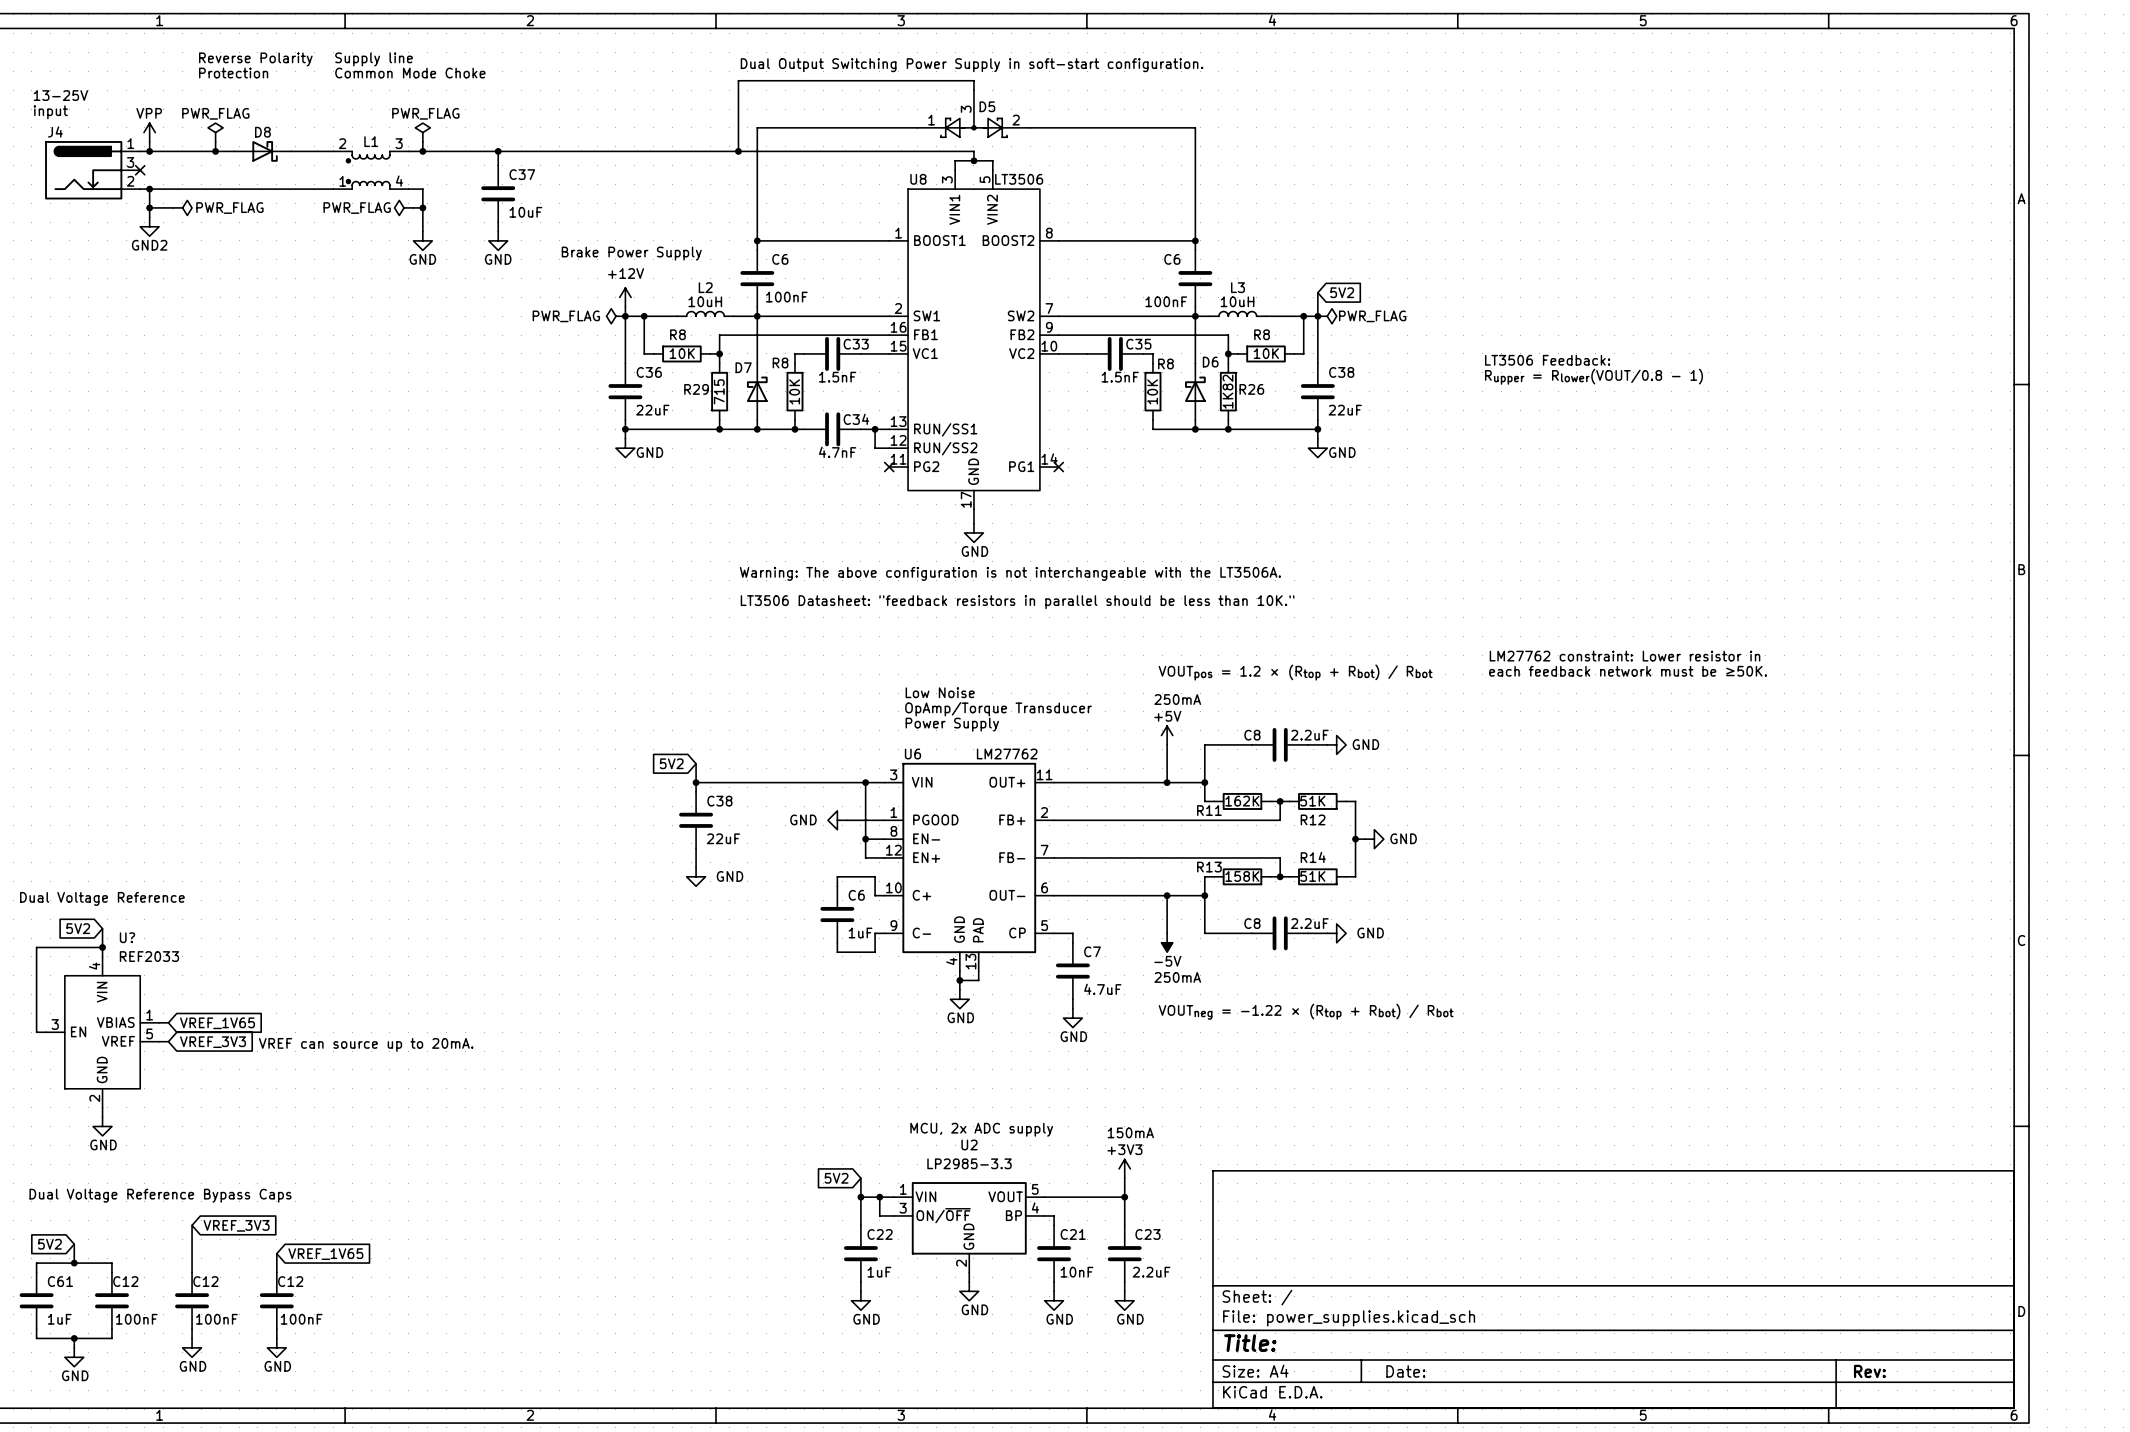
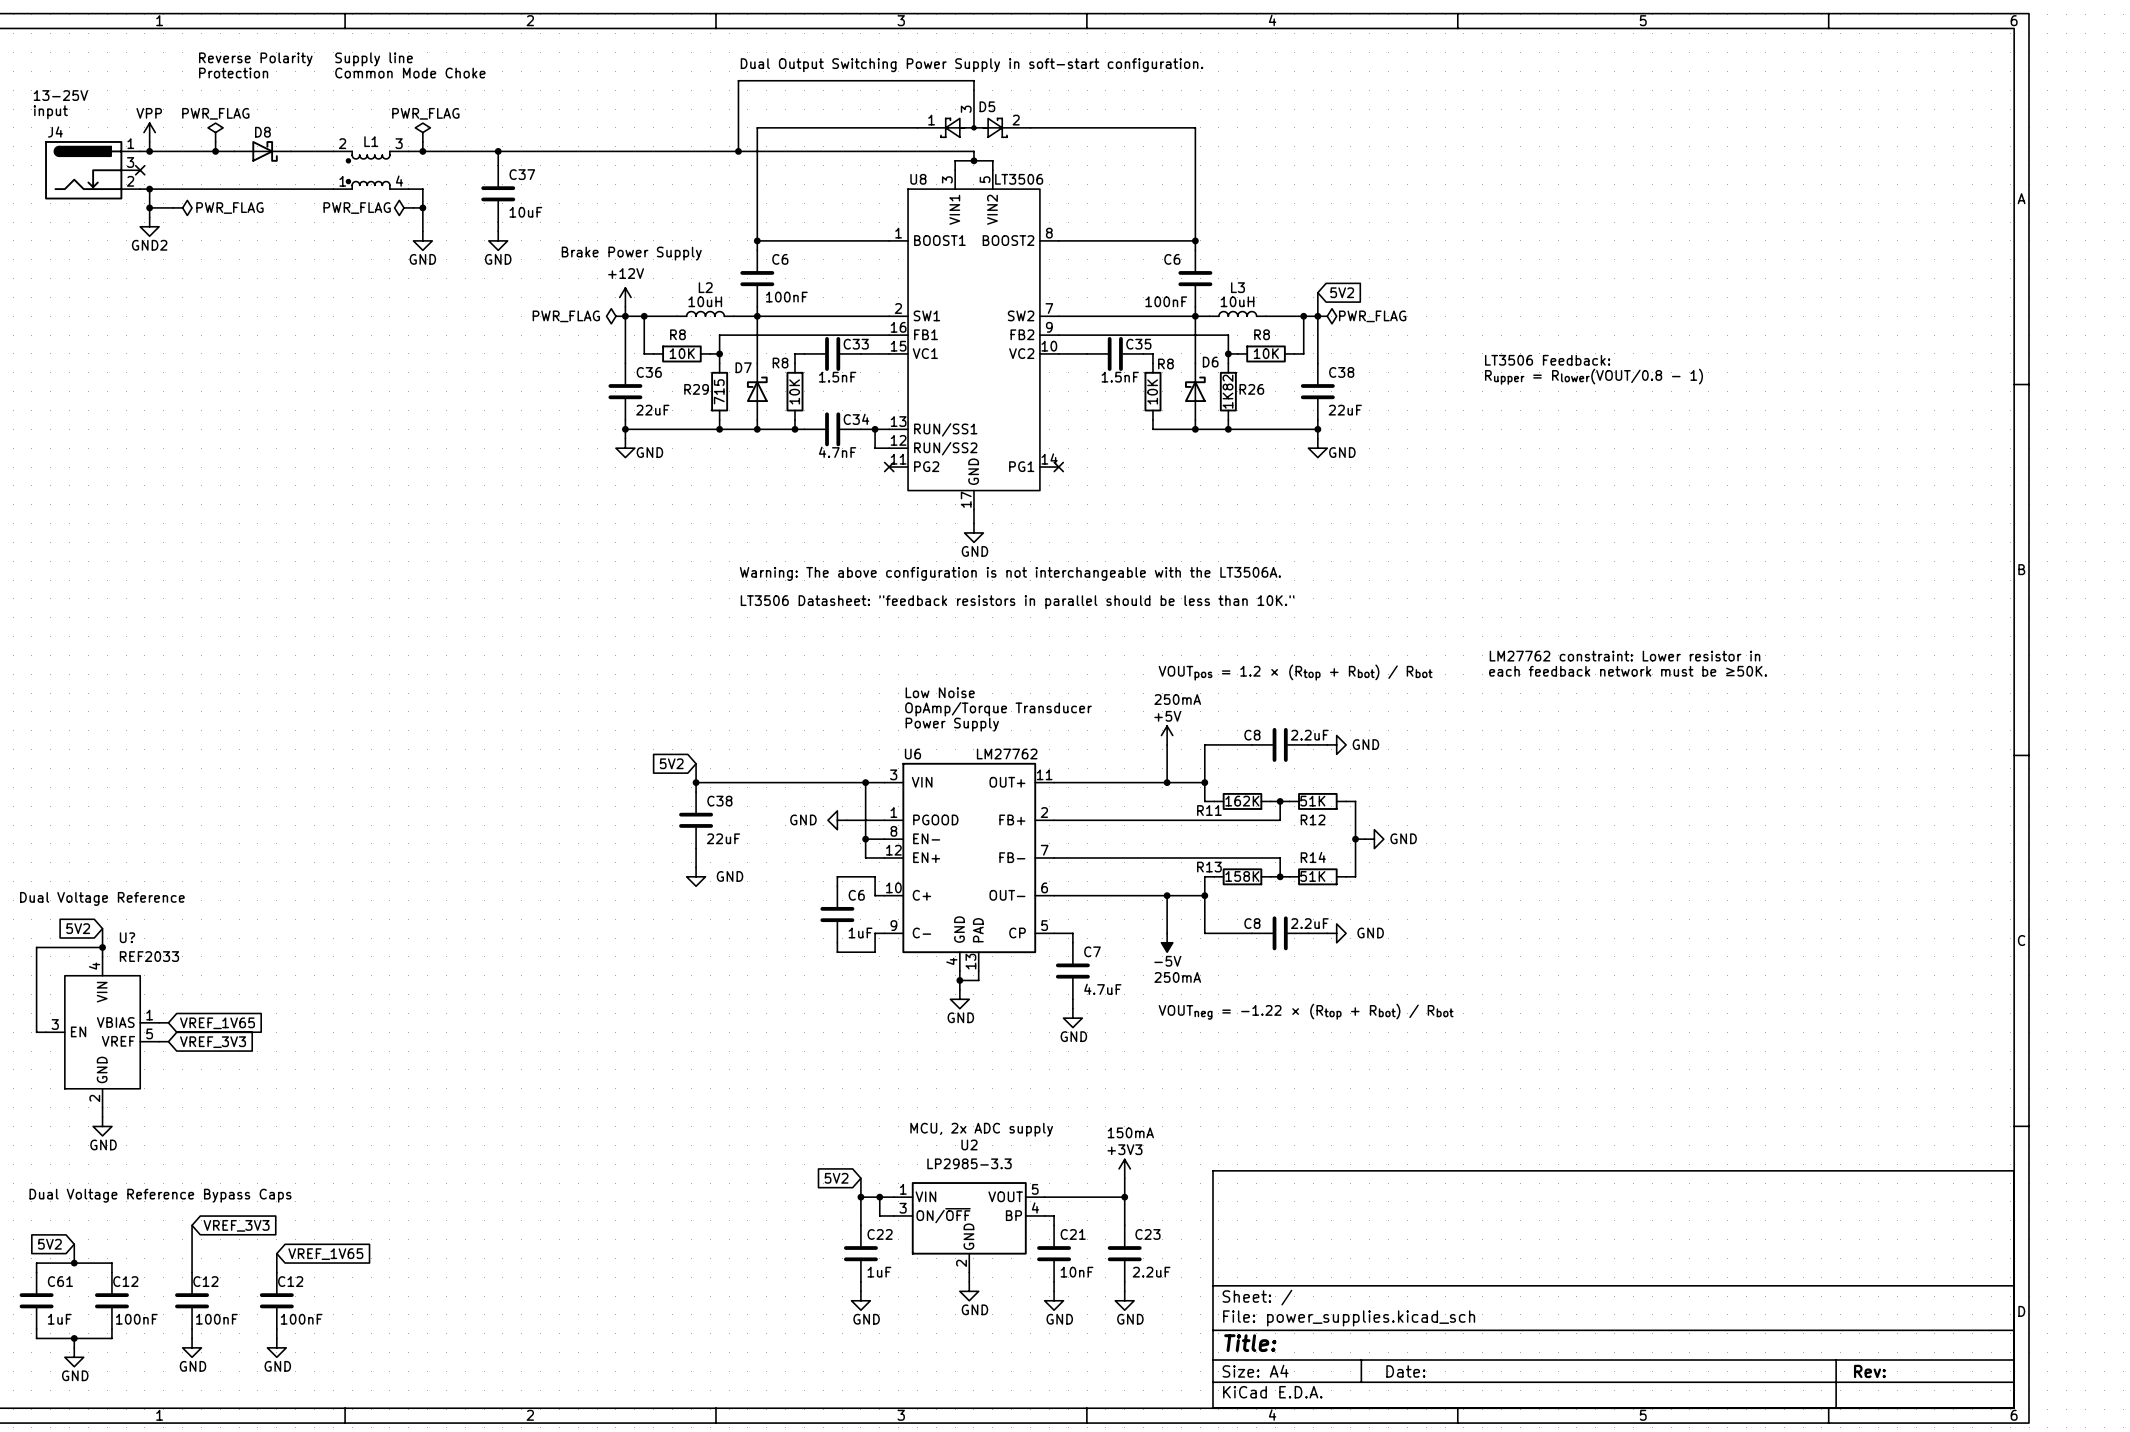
text: VREF can source up to 20mA. (366, 1044) -> none

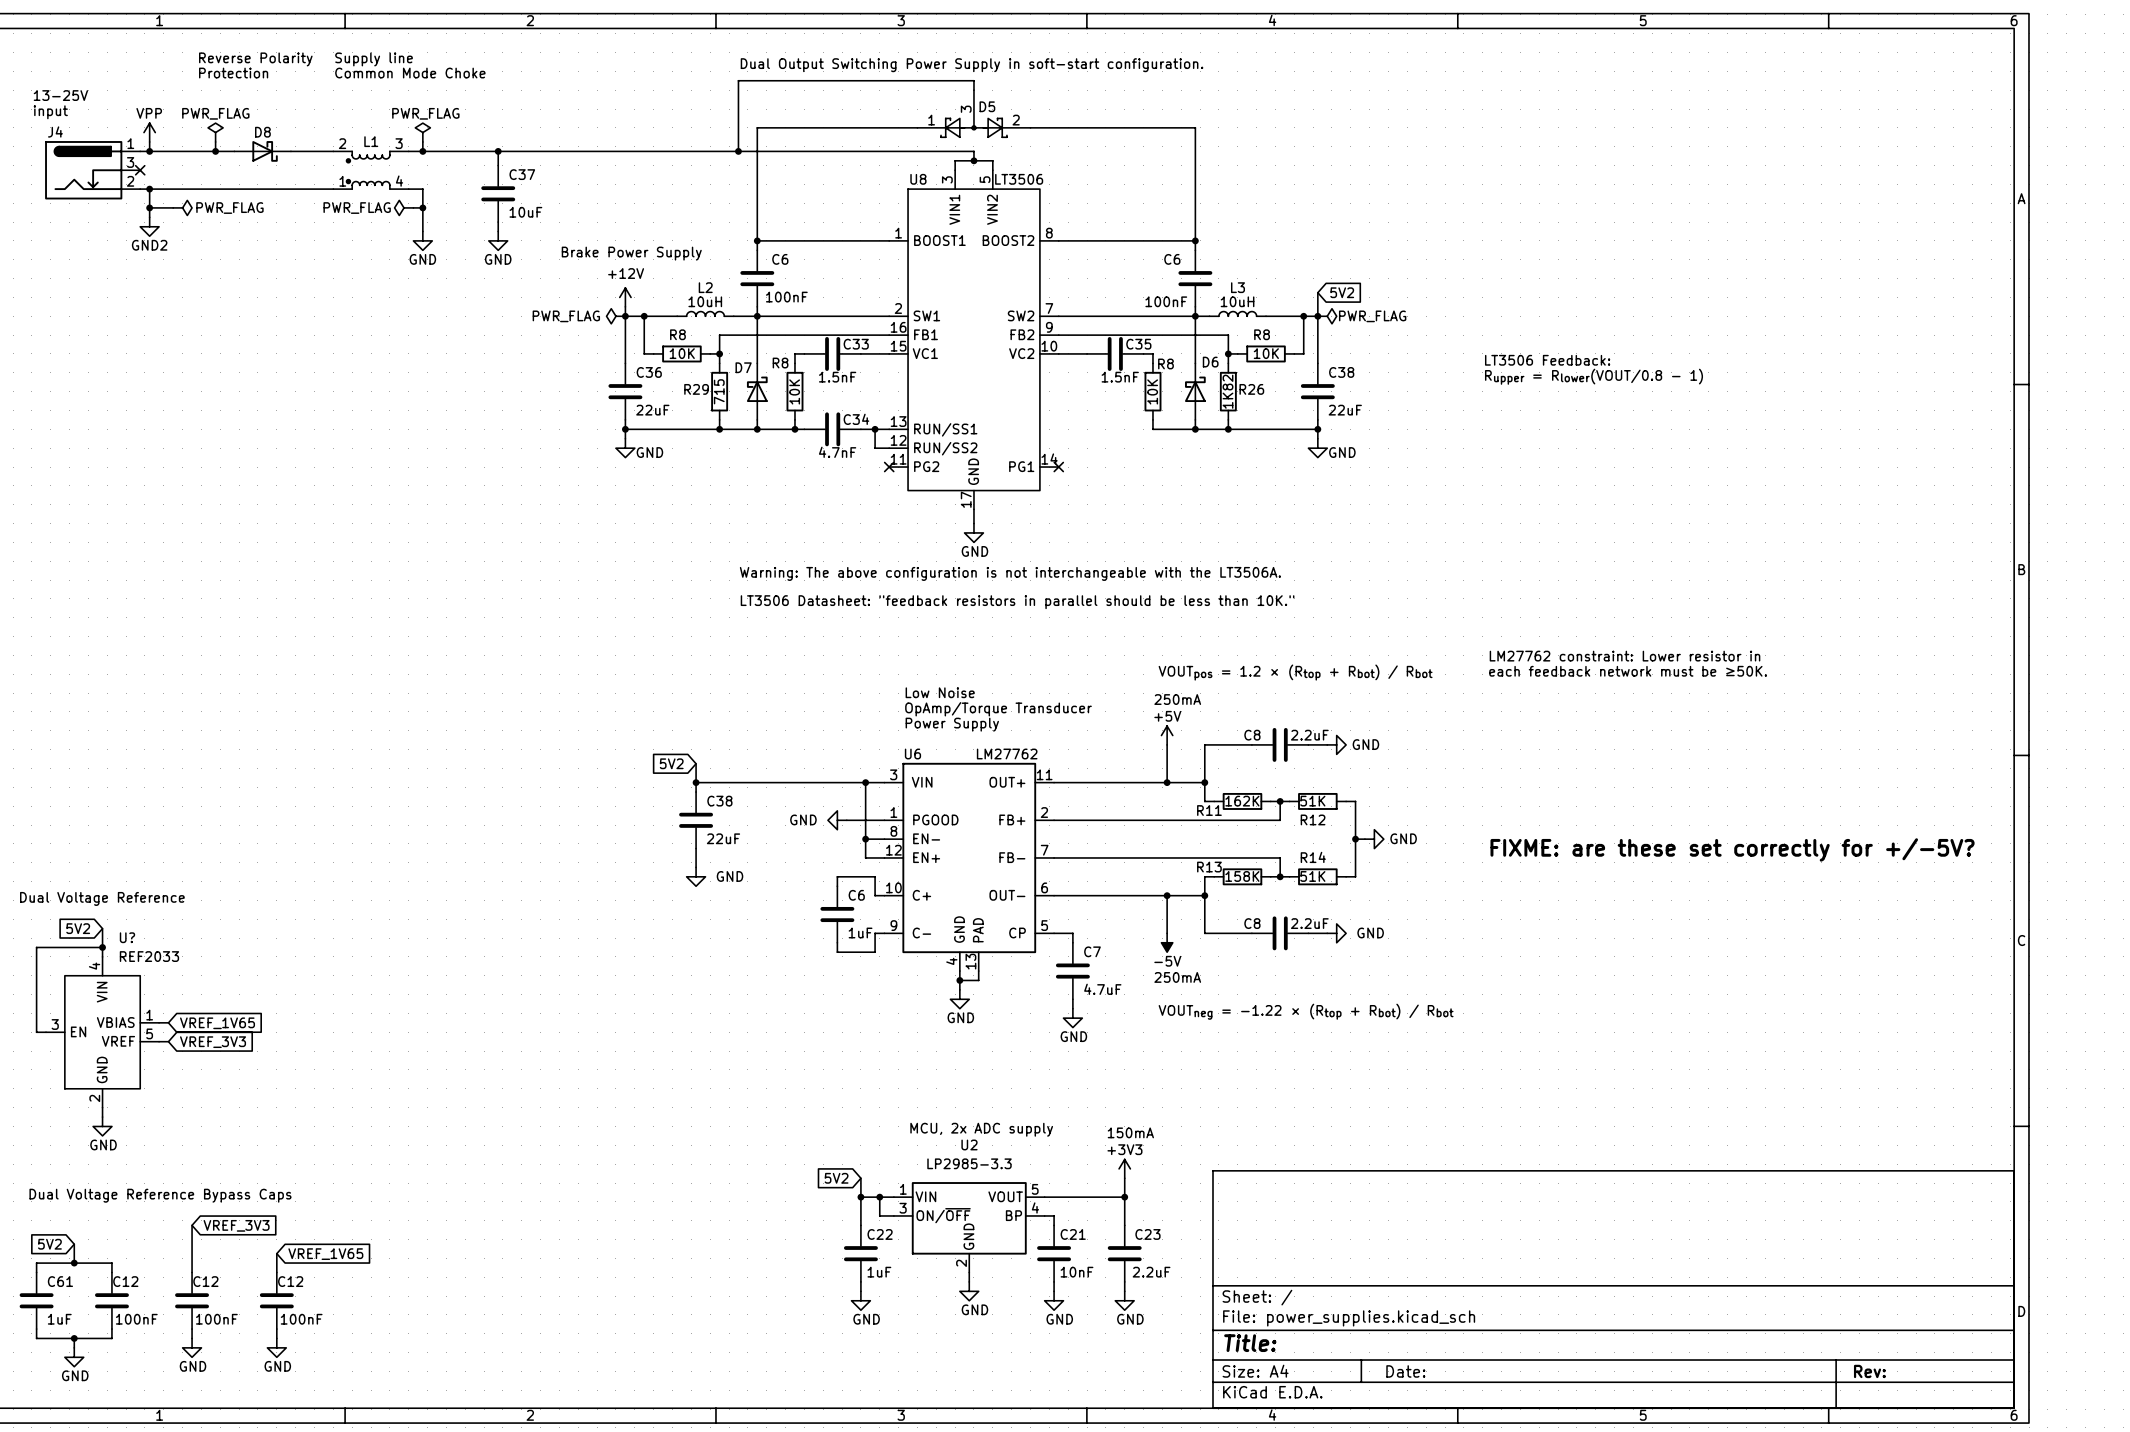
text: none -> FIXME: are these set correctly for +/-5V? (1732, 849)

